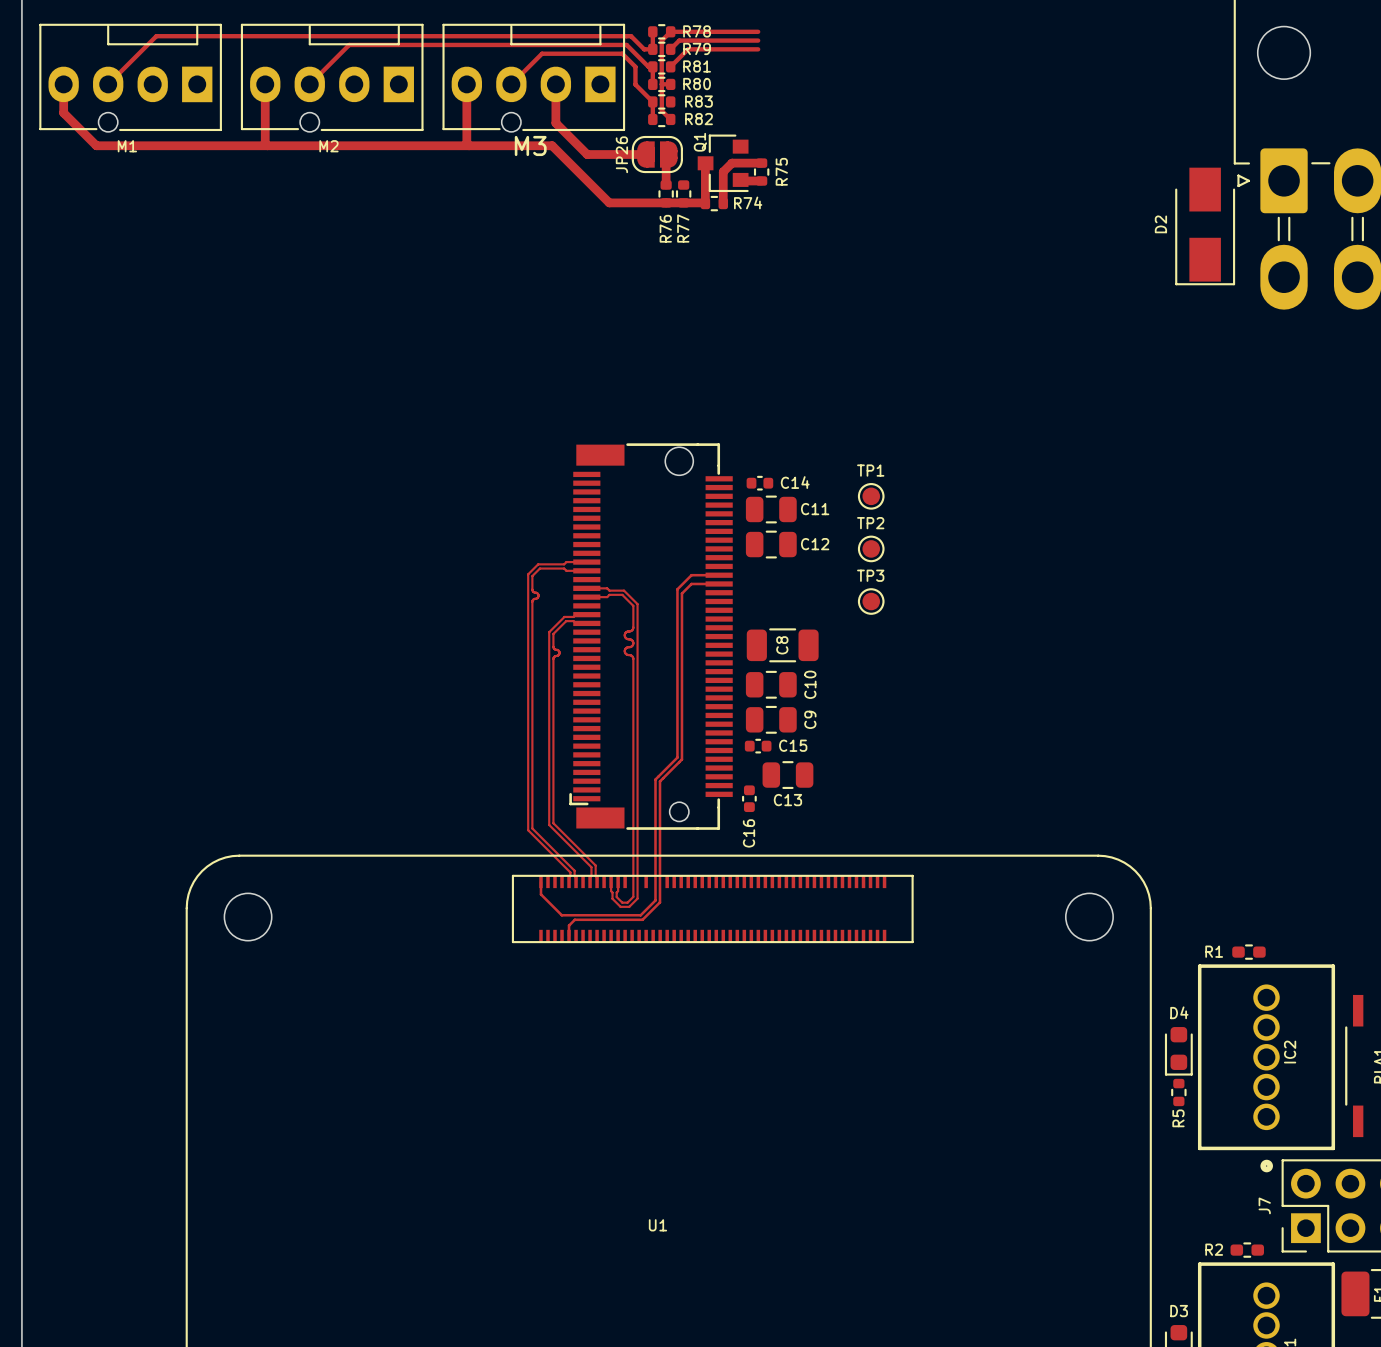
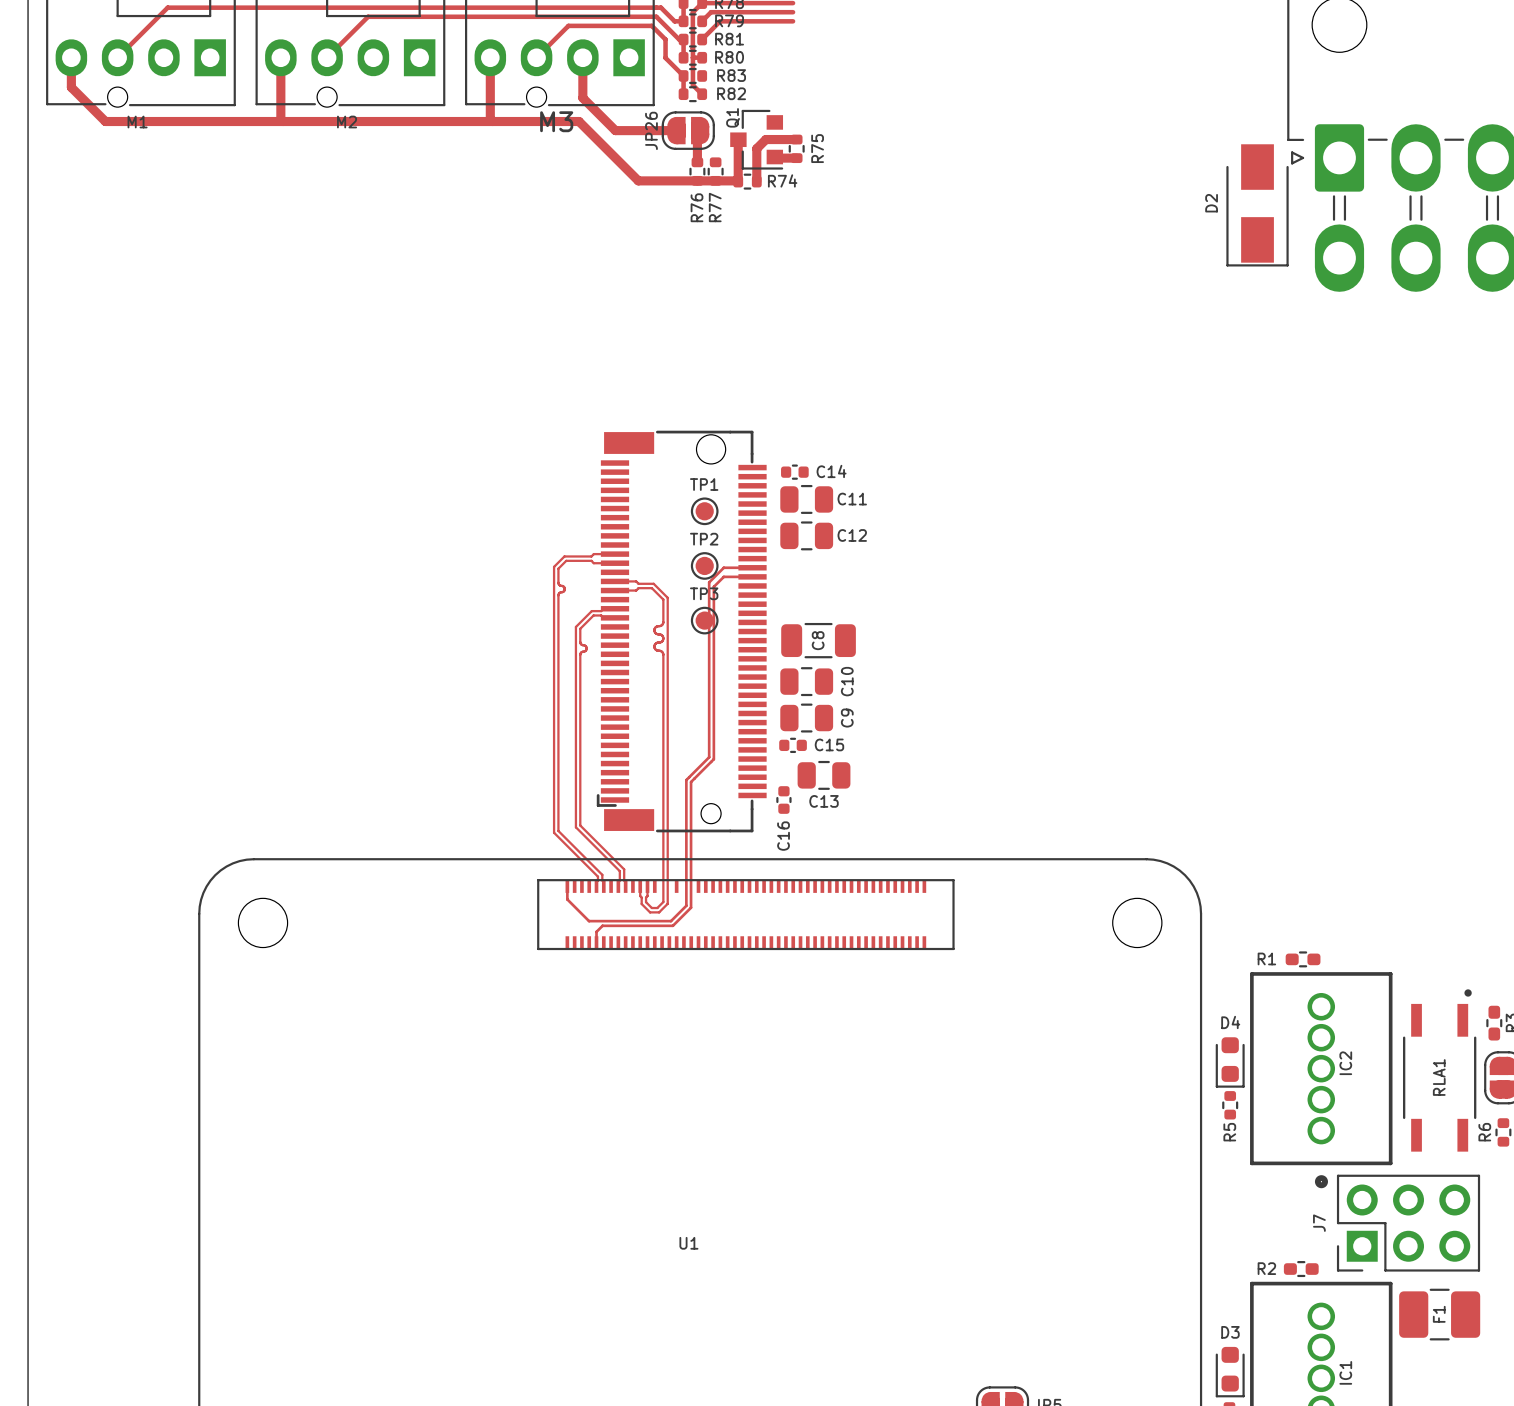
TP1 position: (871, 496) -> (704, 511)
TP2 position: (871, 548) -> (704, 565)
TP3 position: (871, 601) -> (704, 620)

